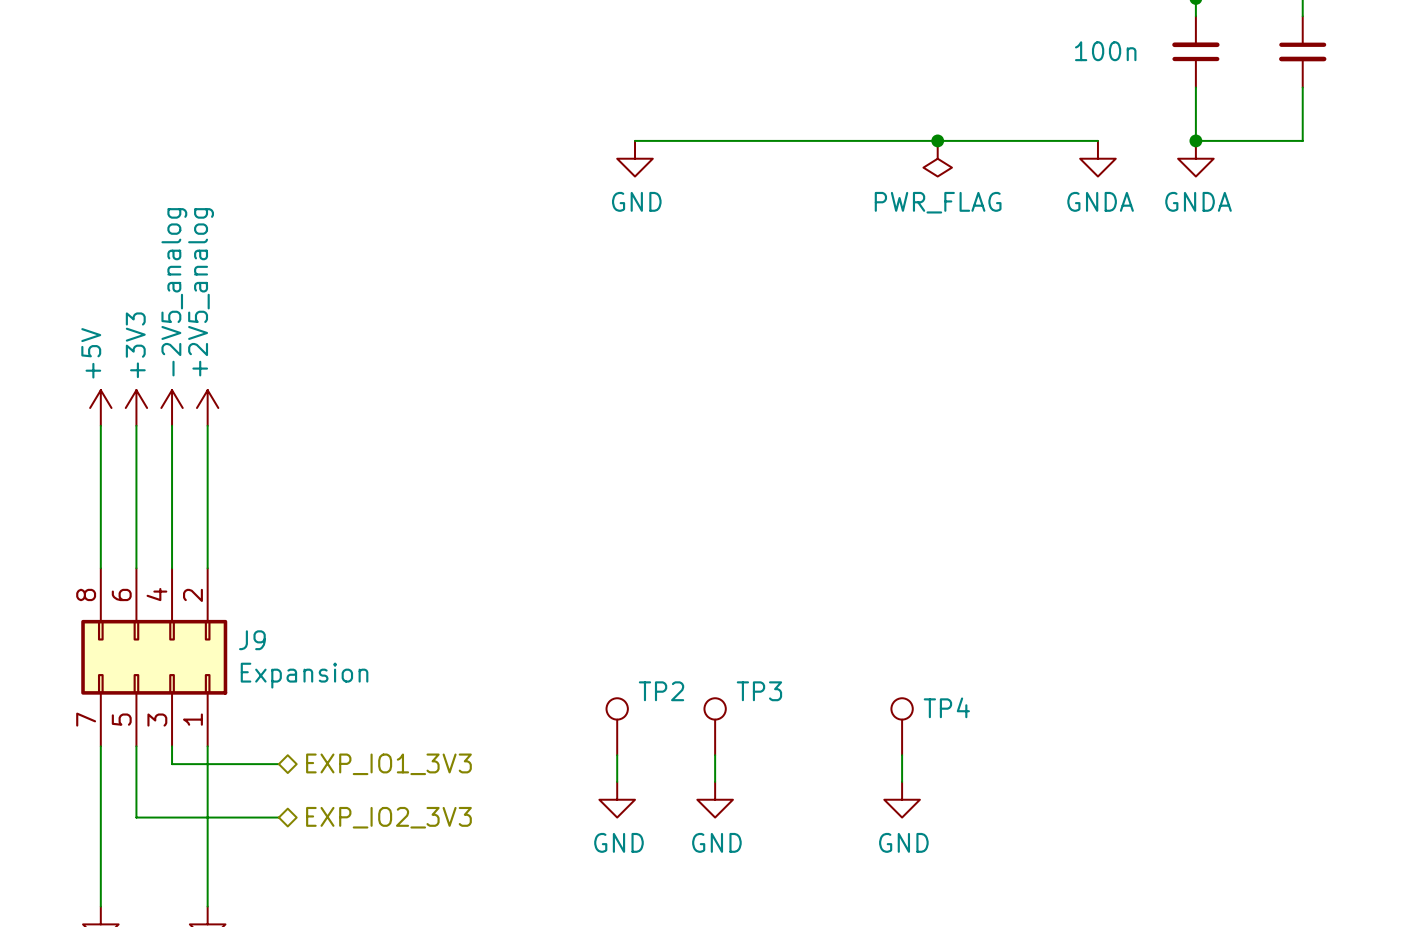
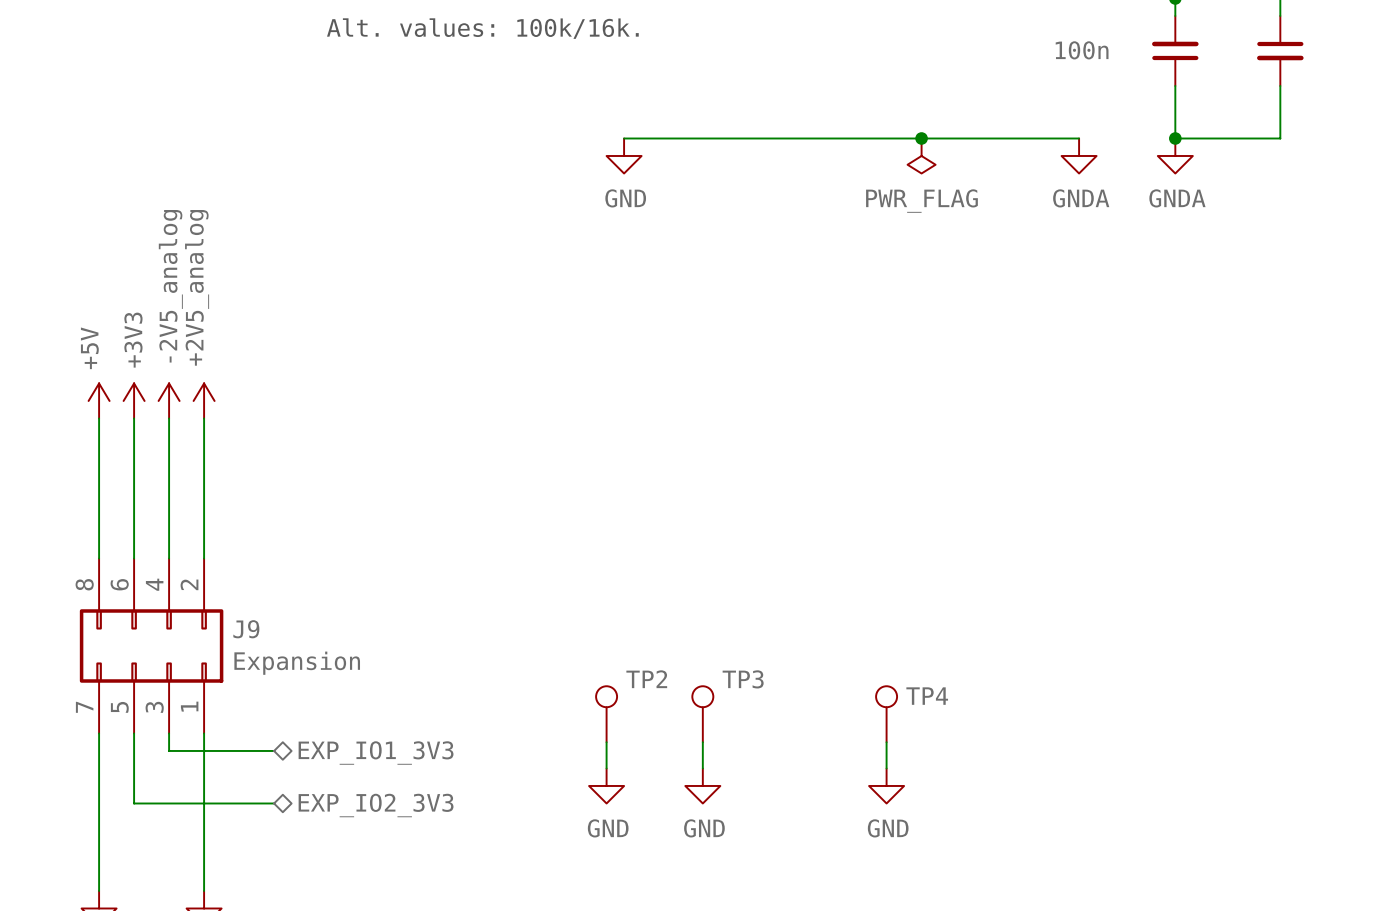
text: none -> Alt. values: 100k/16k. (482, 28)

